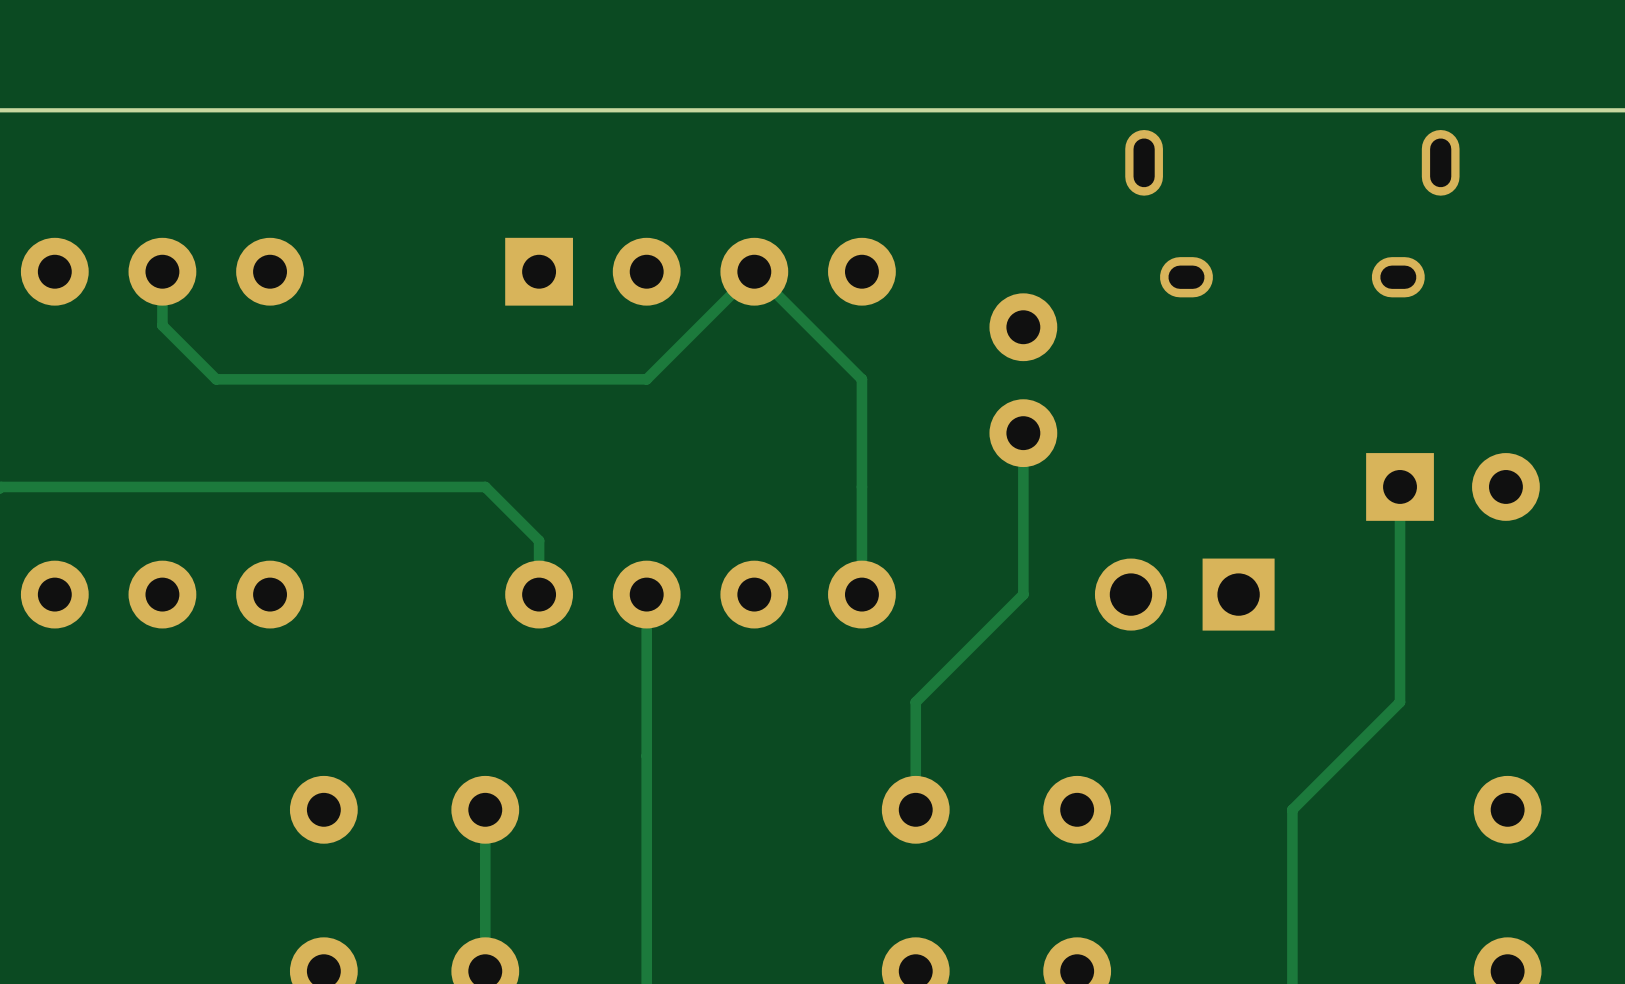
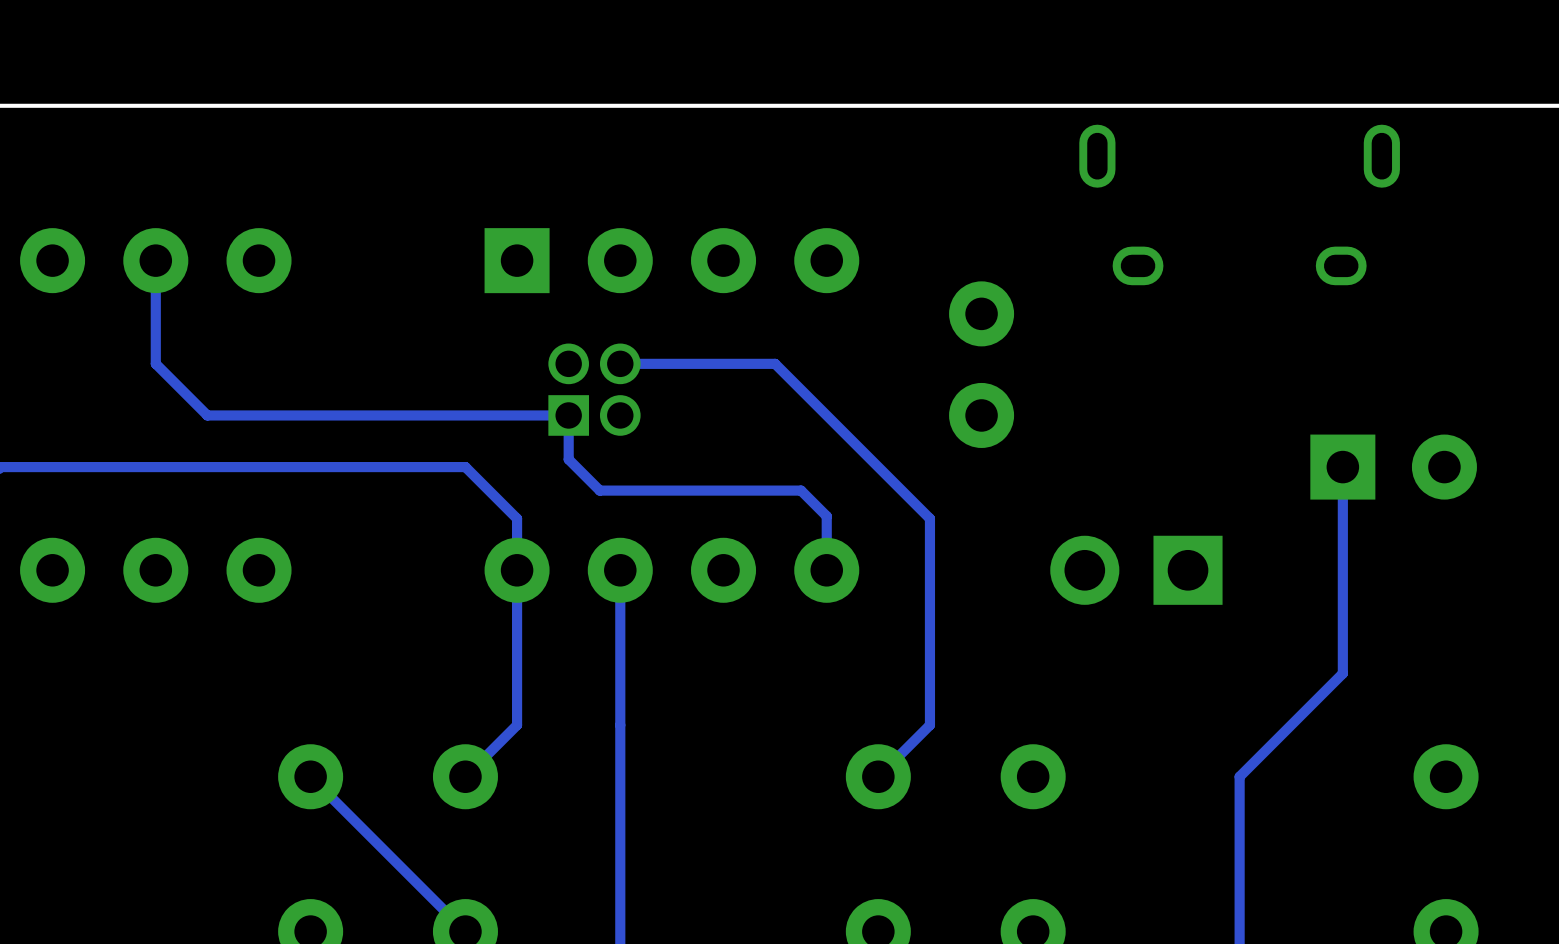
track: (162, 325) (216, 379) (646, 379) (754, 271) (861, 379) (861, 538) -> (155, 312) (155, 363) (207, 415) (568, 415) (568, 459) (599, 490) (801, 490) (826, 516)
part: none -> (594, 389)
track: (1023, 433) (1023, 594) (915, 702) (915, 809) -> (620, 363) (775, 363) (929, 518) (929, 725) (878, 776)
track: none -> (517, 570) (517, 725) (465, 776)
track: (485, 809) (485, 971) -> (310, 776) (465, 931)

